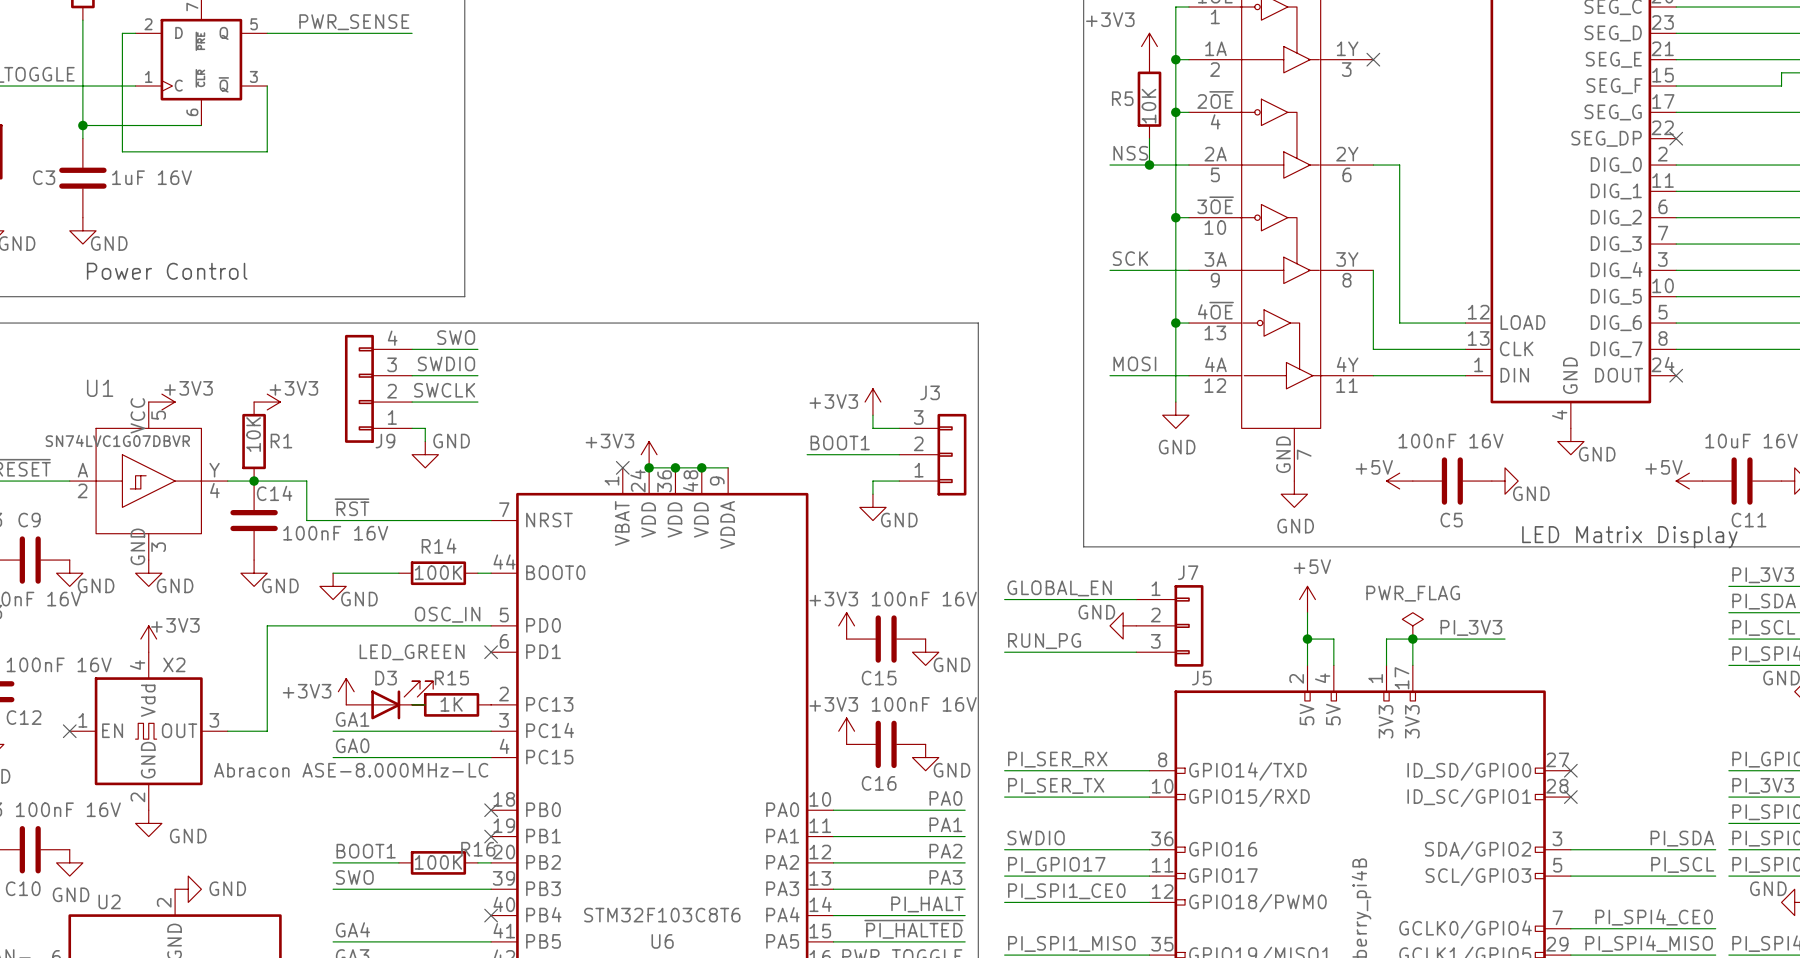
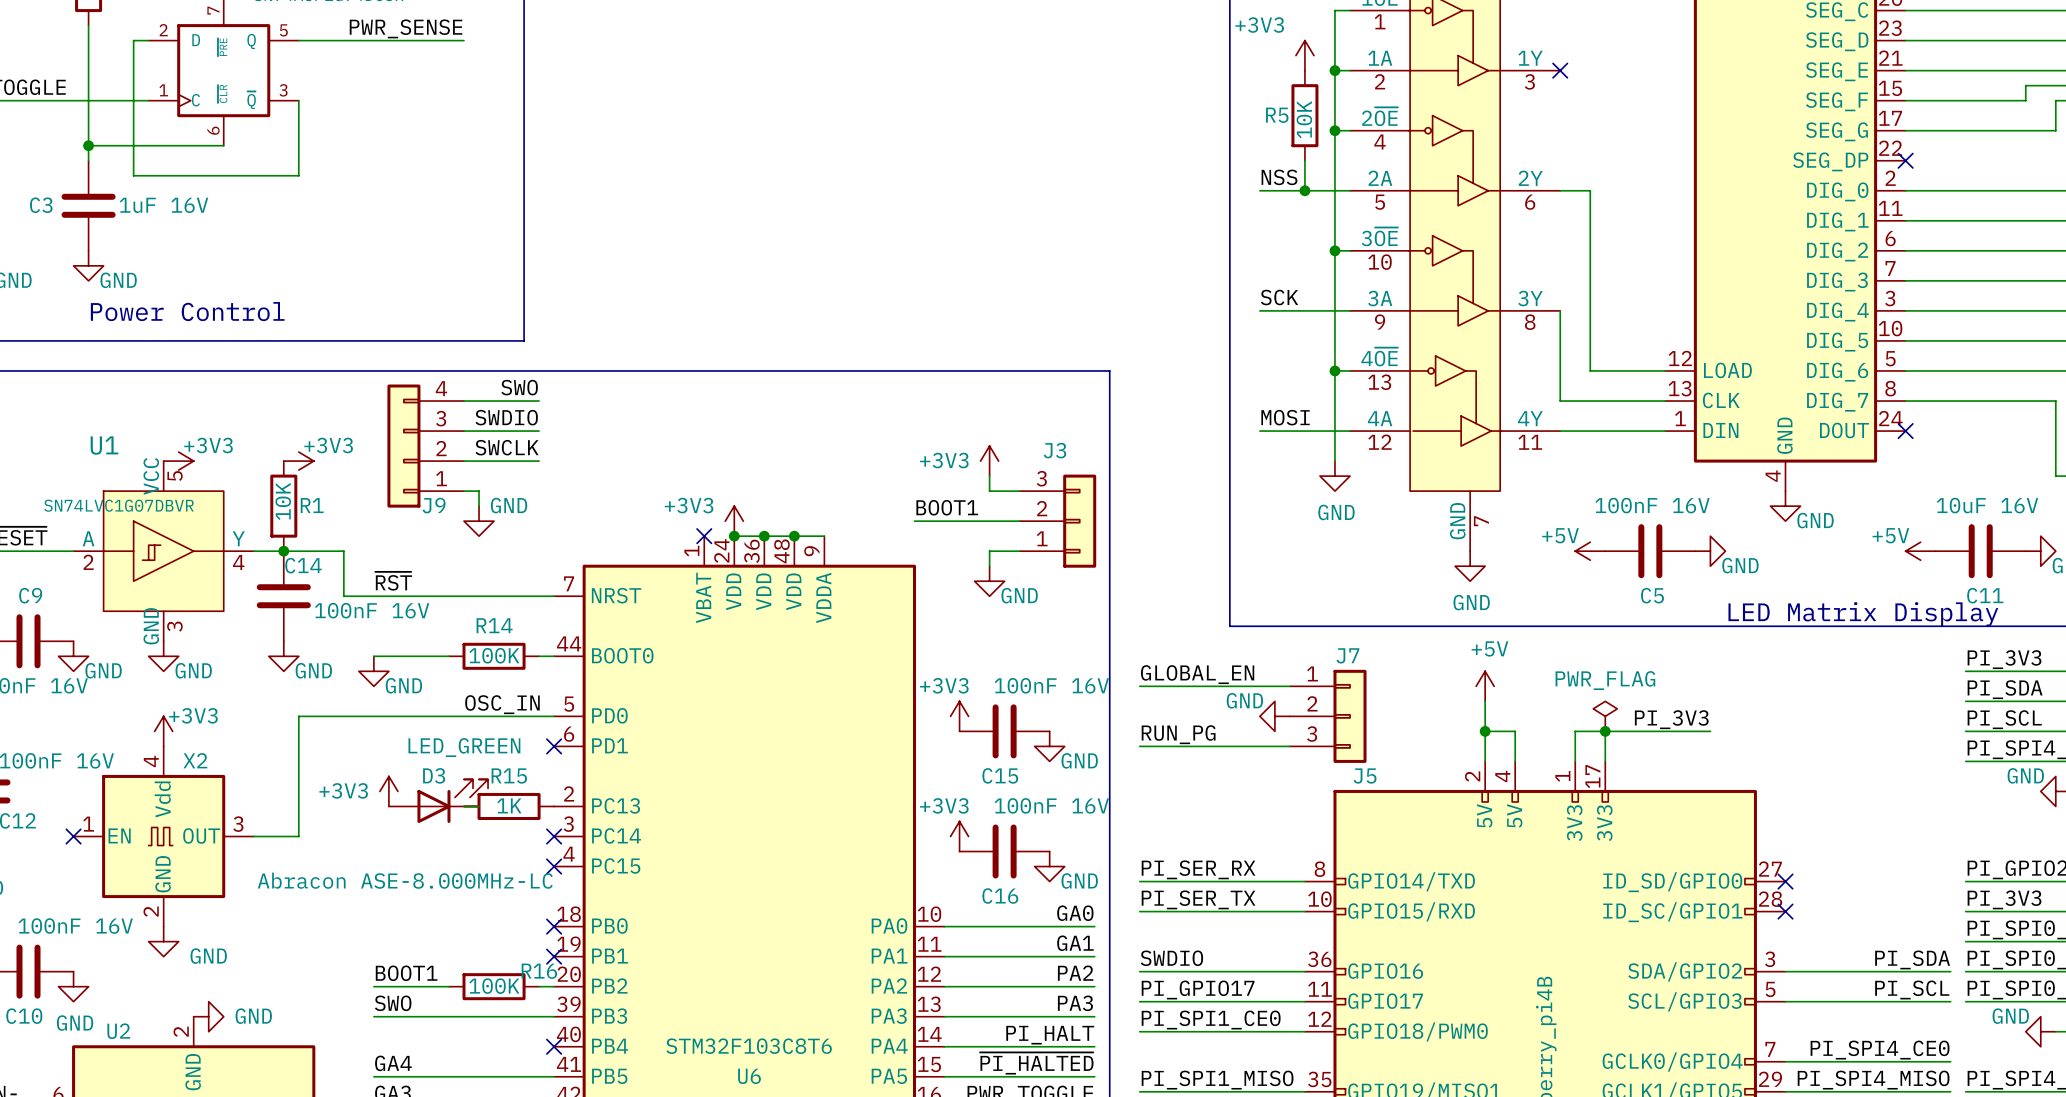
label: GA1 (352, 719) -> none
wire: (333, 731) (491, 731) -> none
no-connect mark: none -> (554, 836)
label: GA0 (352, 745) -> none
wire: (333, 757) (491, 757) -> none
no-connect mark: none -> (554, 866)
label: PA0 (945, 798) -> GA0 (1075, 913)
label: PA1 (945, 824) -> GA1 (1075, 943)

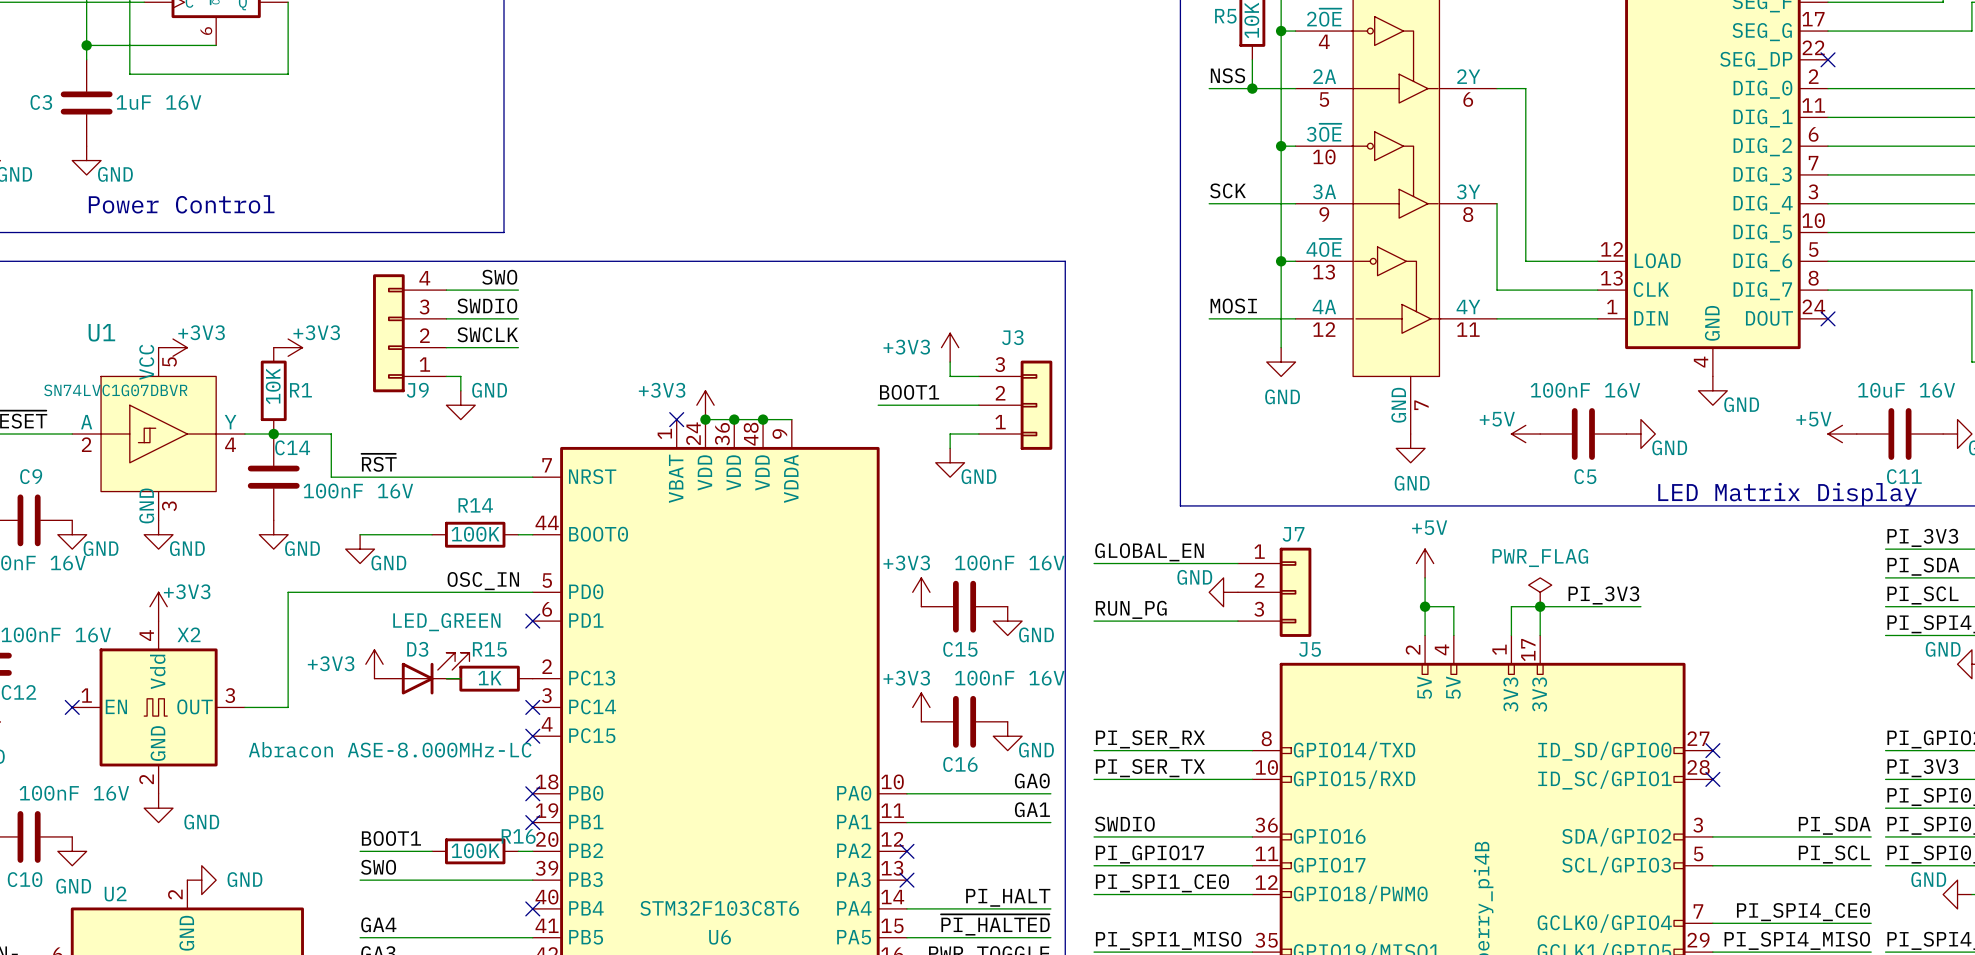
label: PA2 (1075, 973) -> none
wire: (944, 986) (1094, 986) -> none
no-connect mark: none -> (906, 851)
label: PA3 (1075, 1003) -> none
wire: (944, 1016) (1094, 1016) -> none
no-connect mark: none -> (906, 880)

